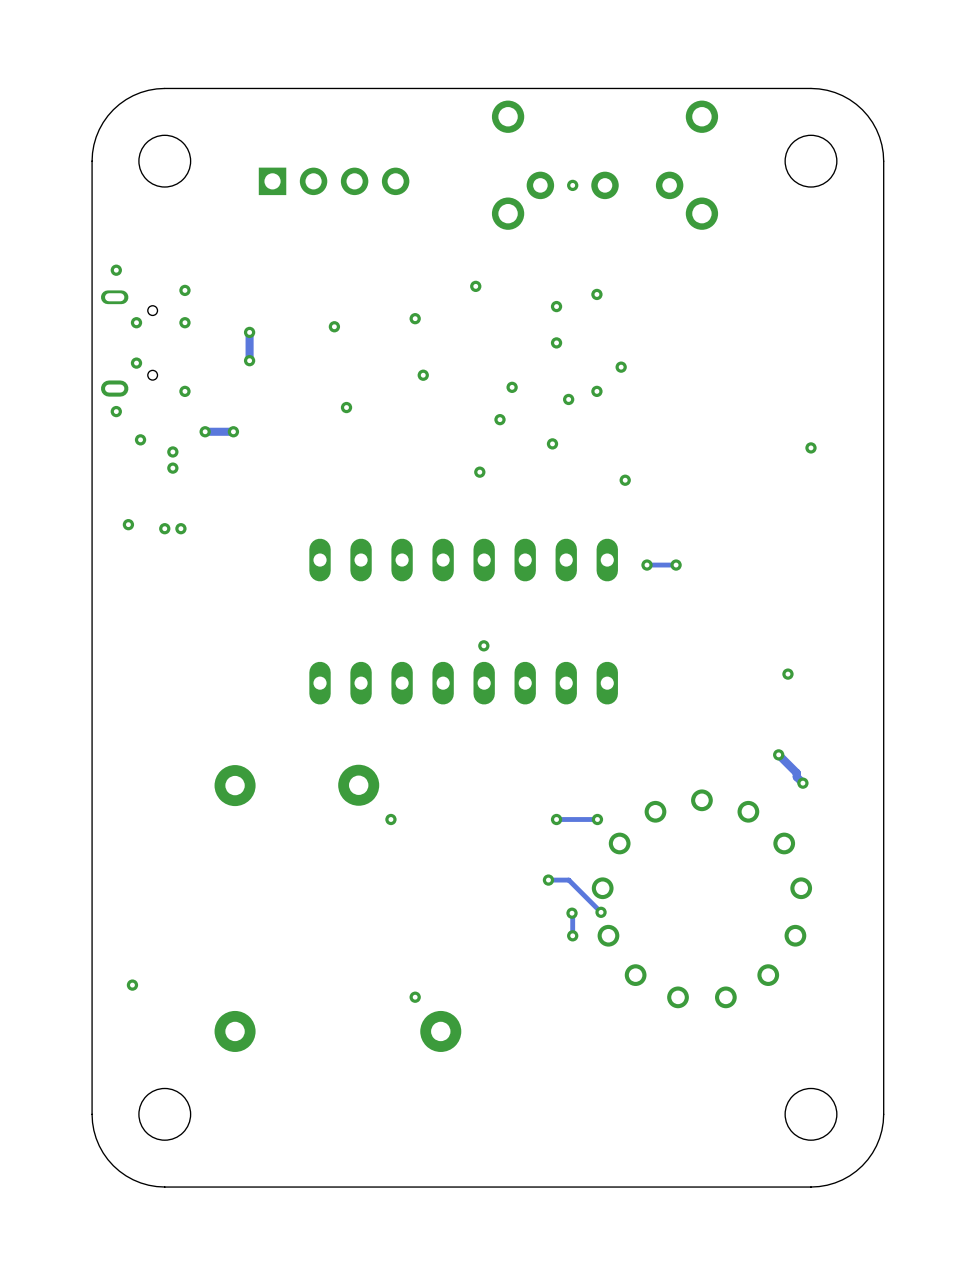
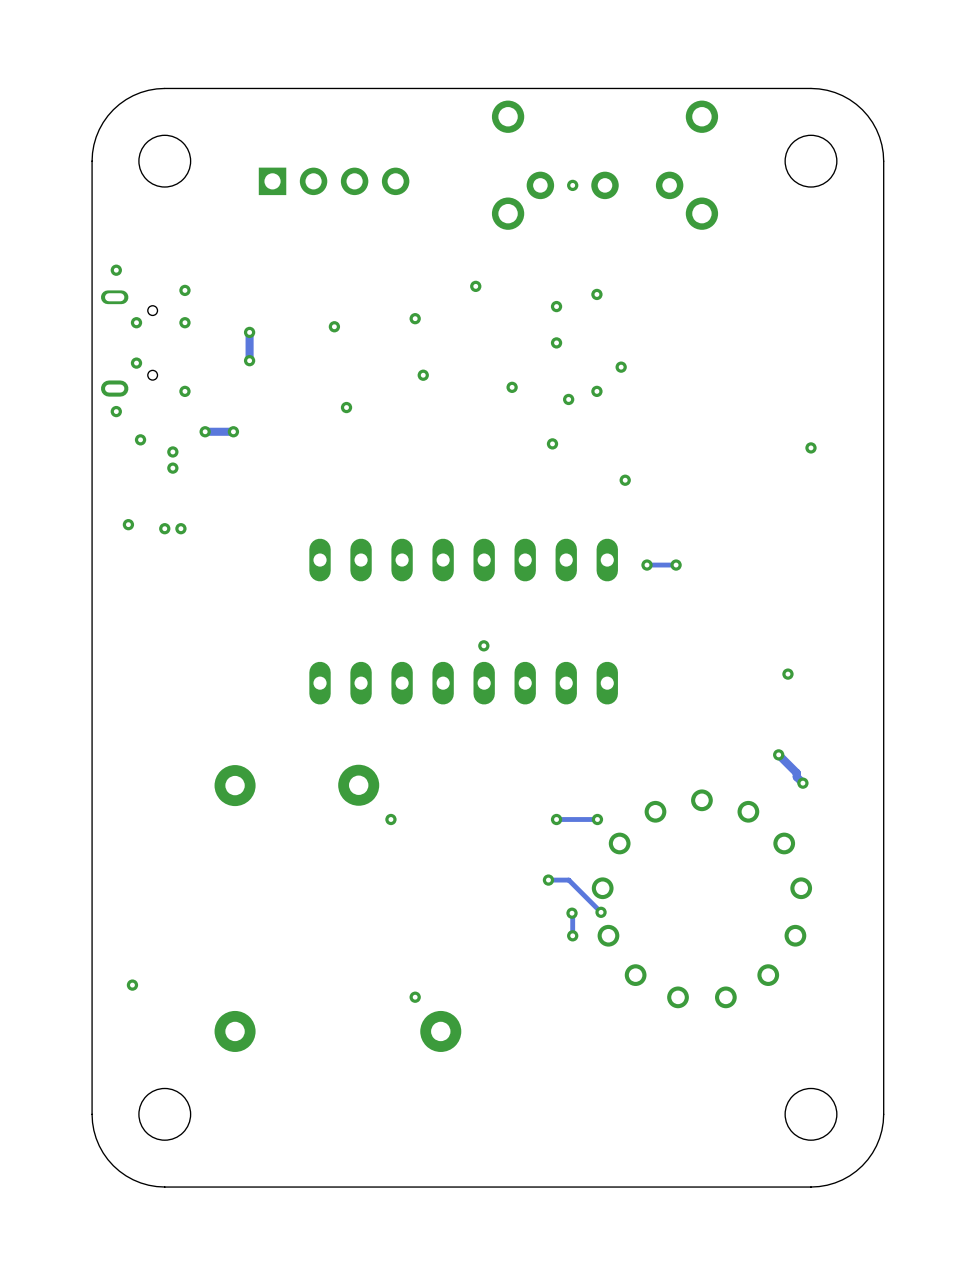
via: (499, 419) -> none
via: (479, 472) -> none

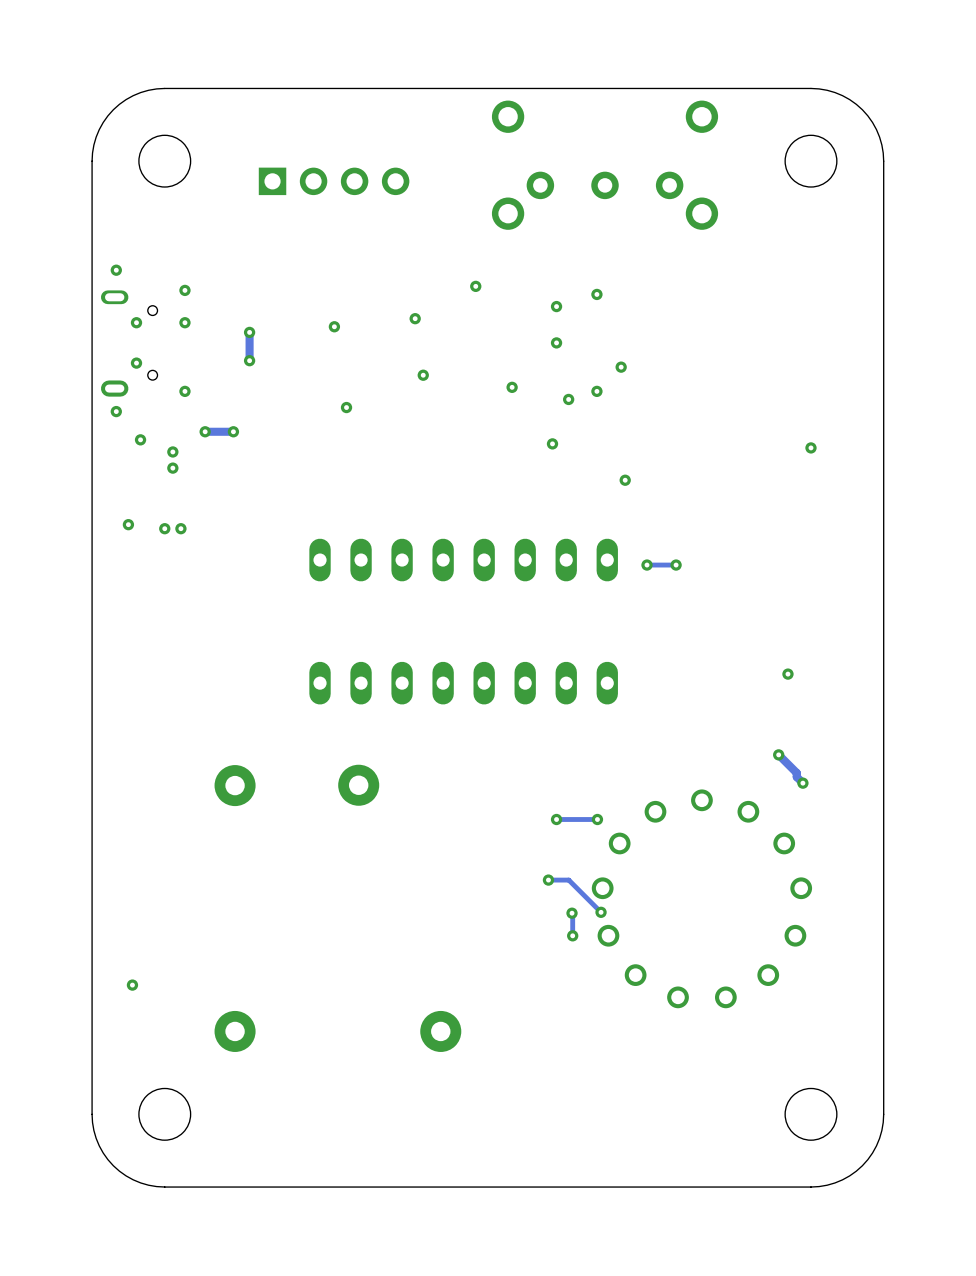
via: (572, 185) -> none
via: (483, 645) -> none
via: (390, 819) -> none
via: (415, 997) -> none

